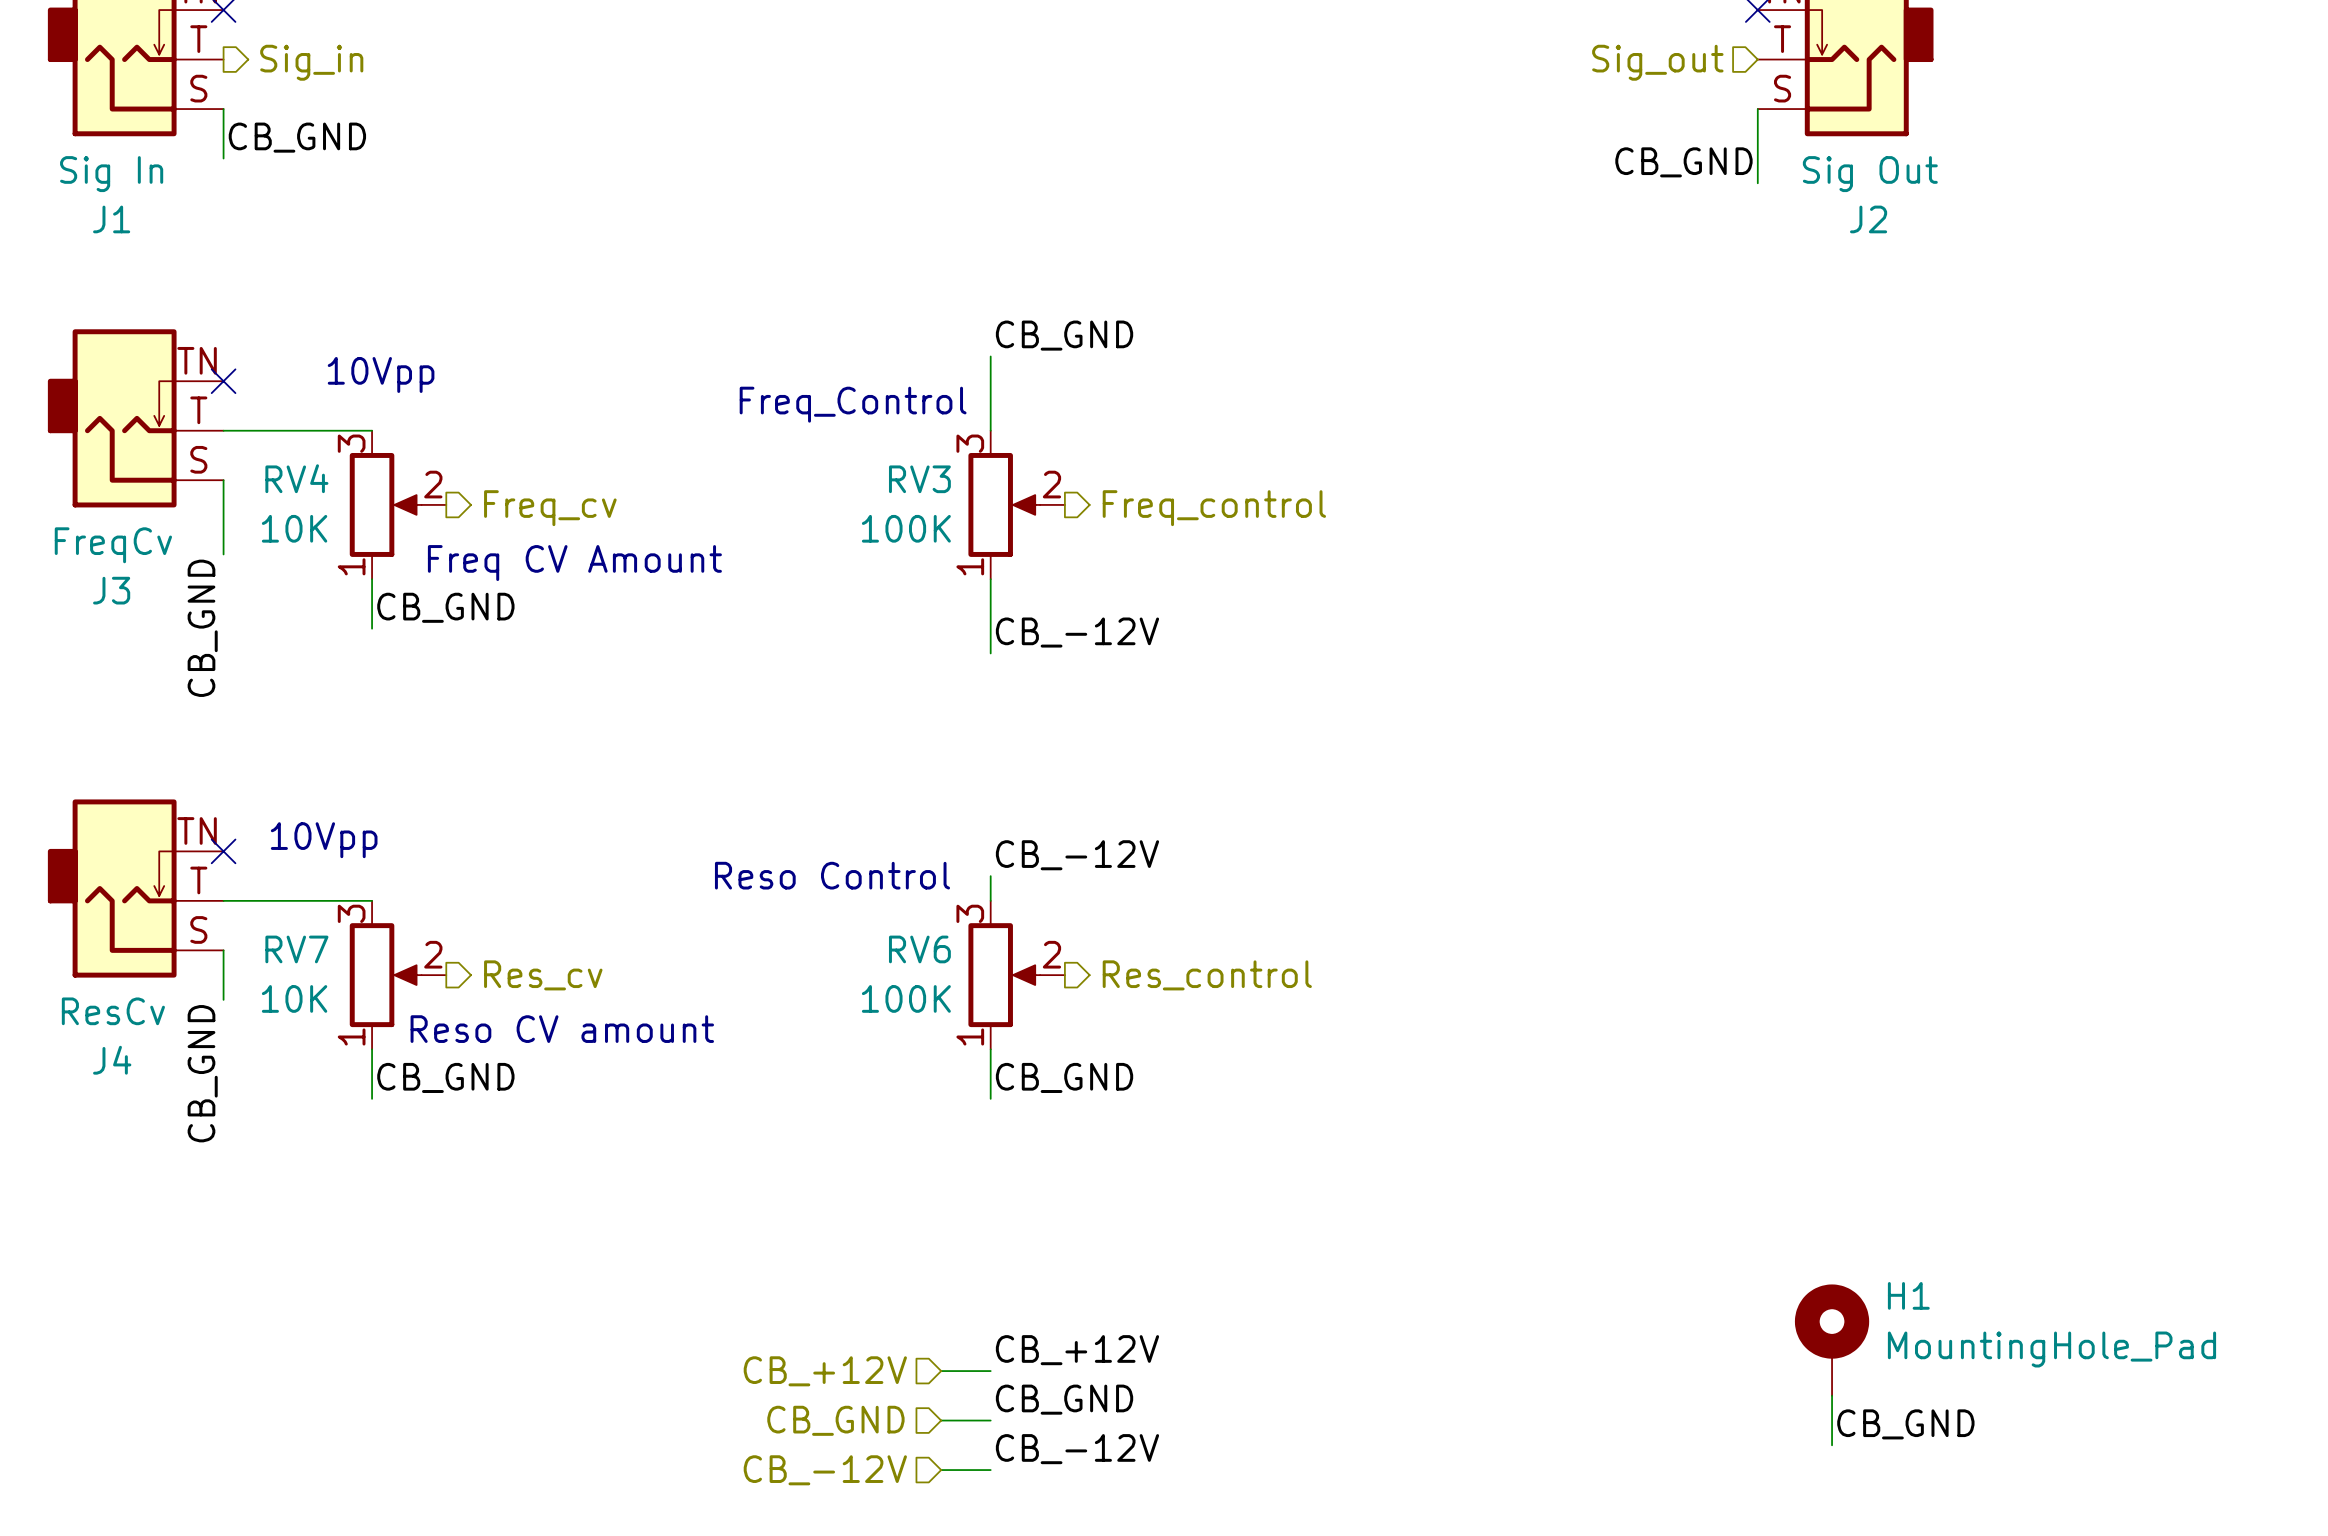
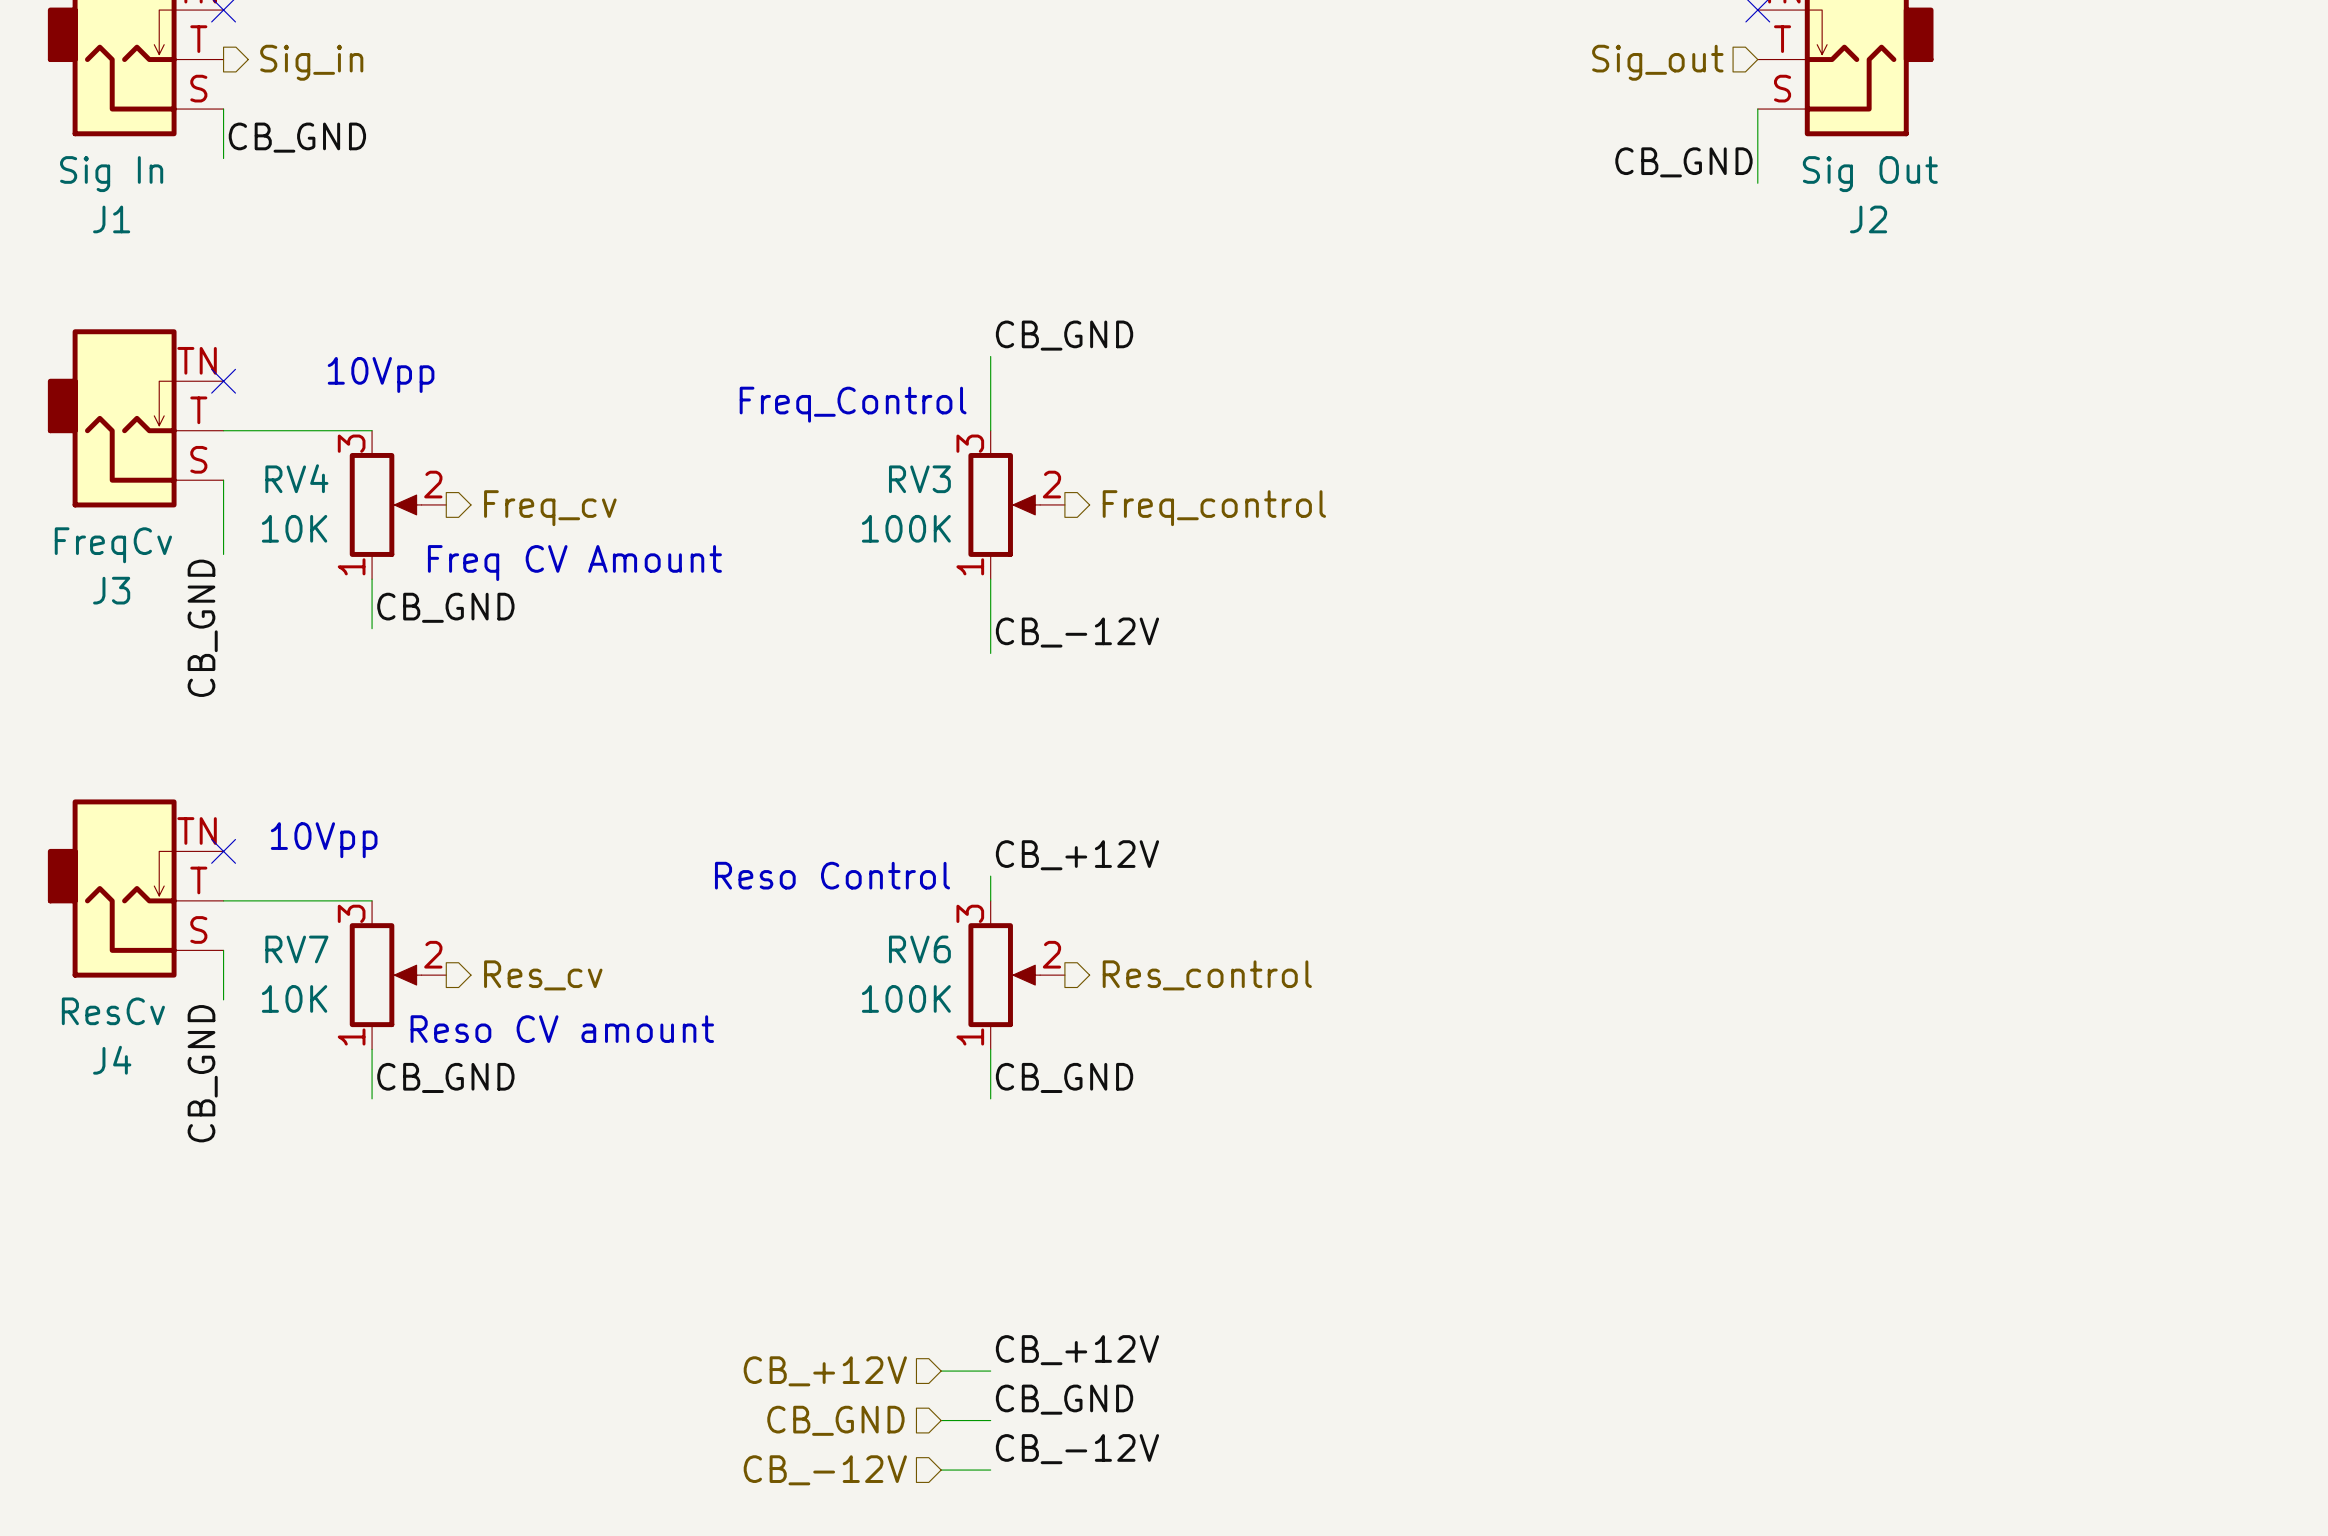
label: CB_-12V (1077, 855) -> CB_+12V (1077, 855)
H1: MountingHole_Pad (1832, 1340) -> none
wire: (1832, 1395) (1832, 1445) -> none
label: CB_GND (1905, 1424) -> none

